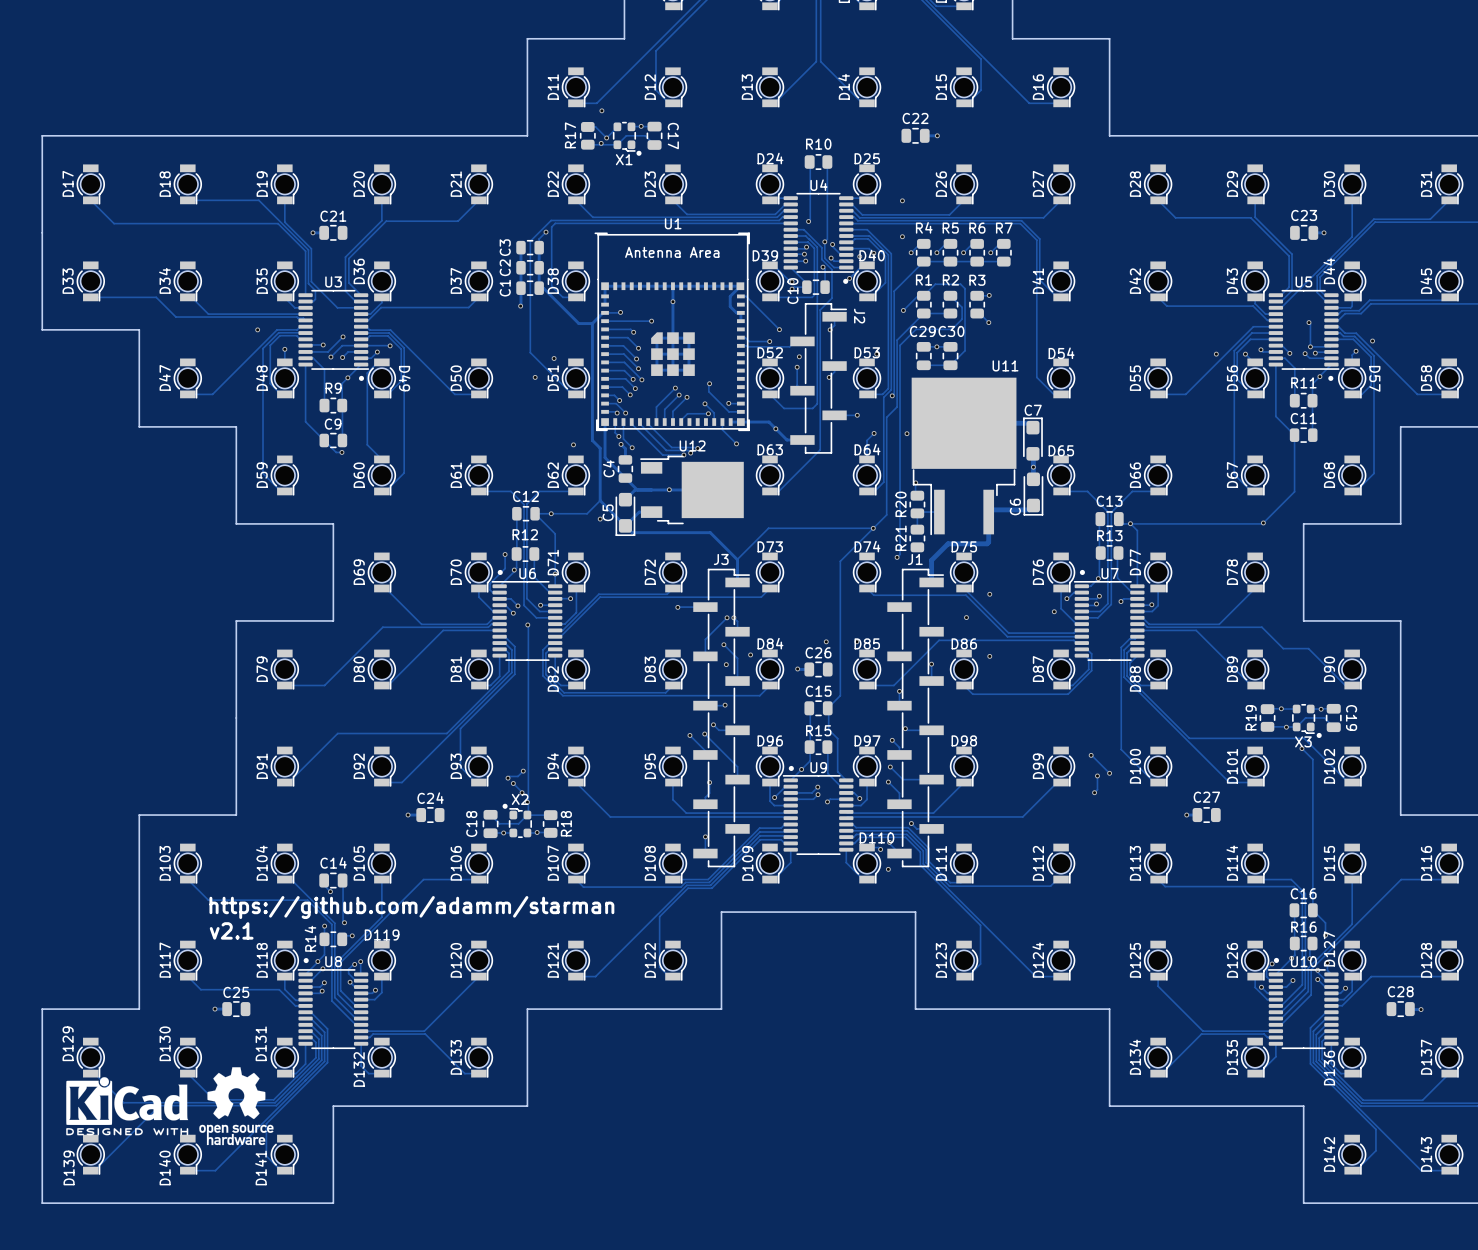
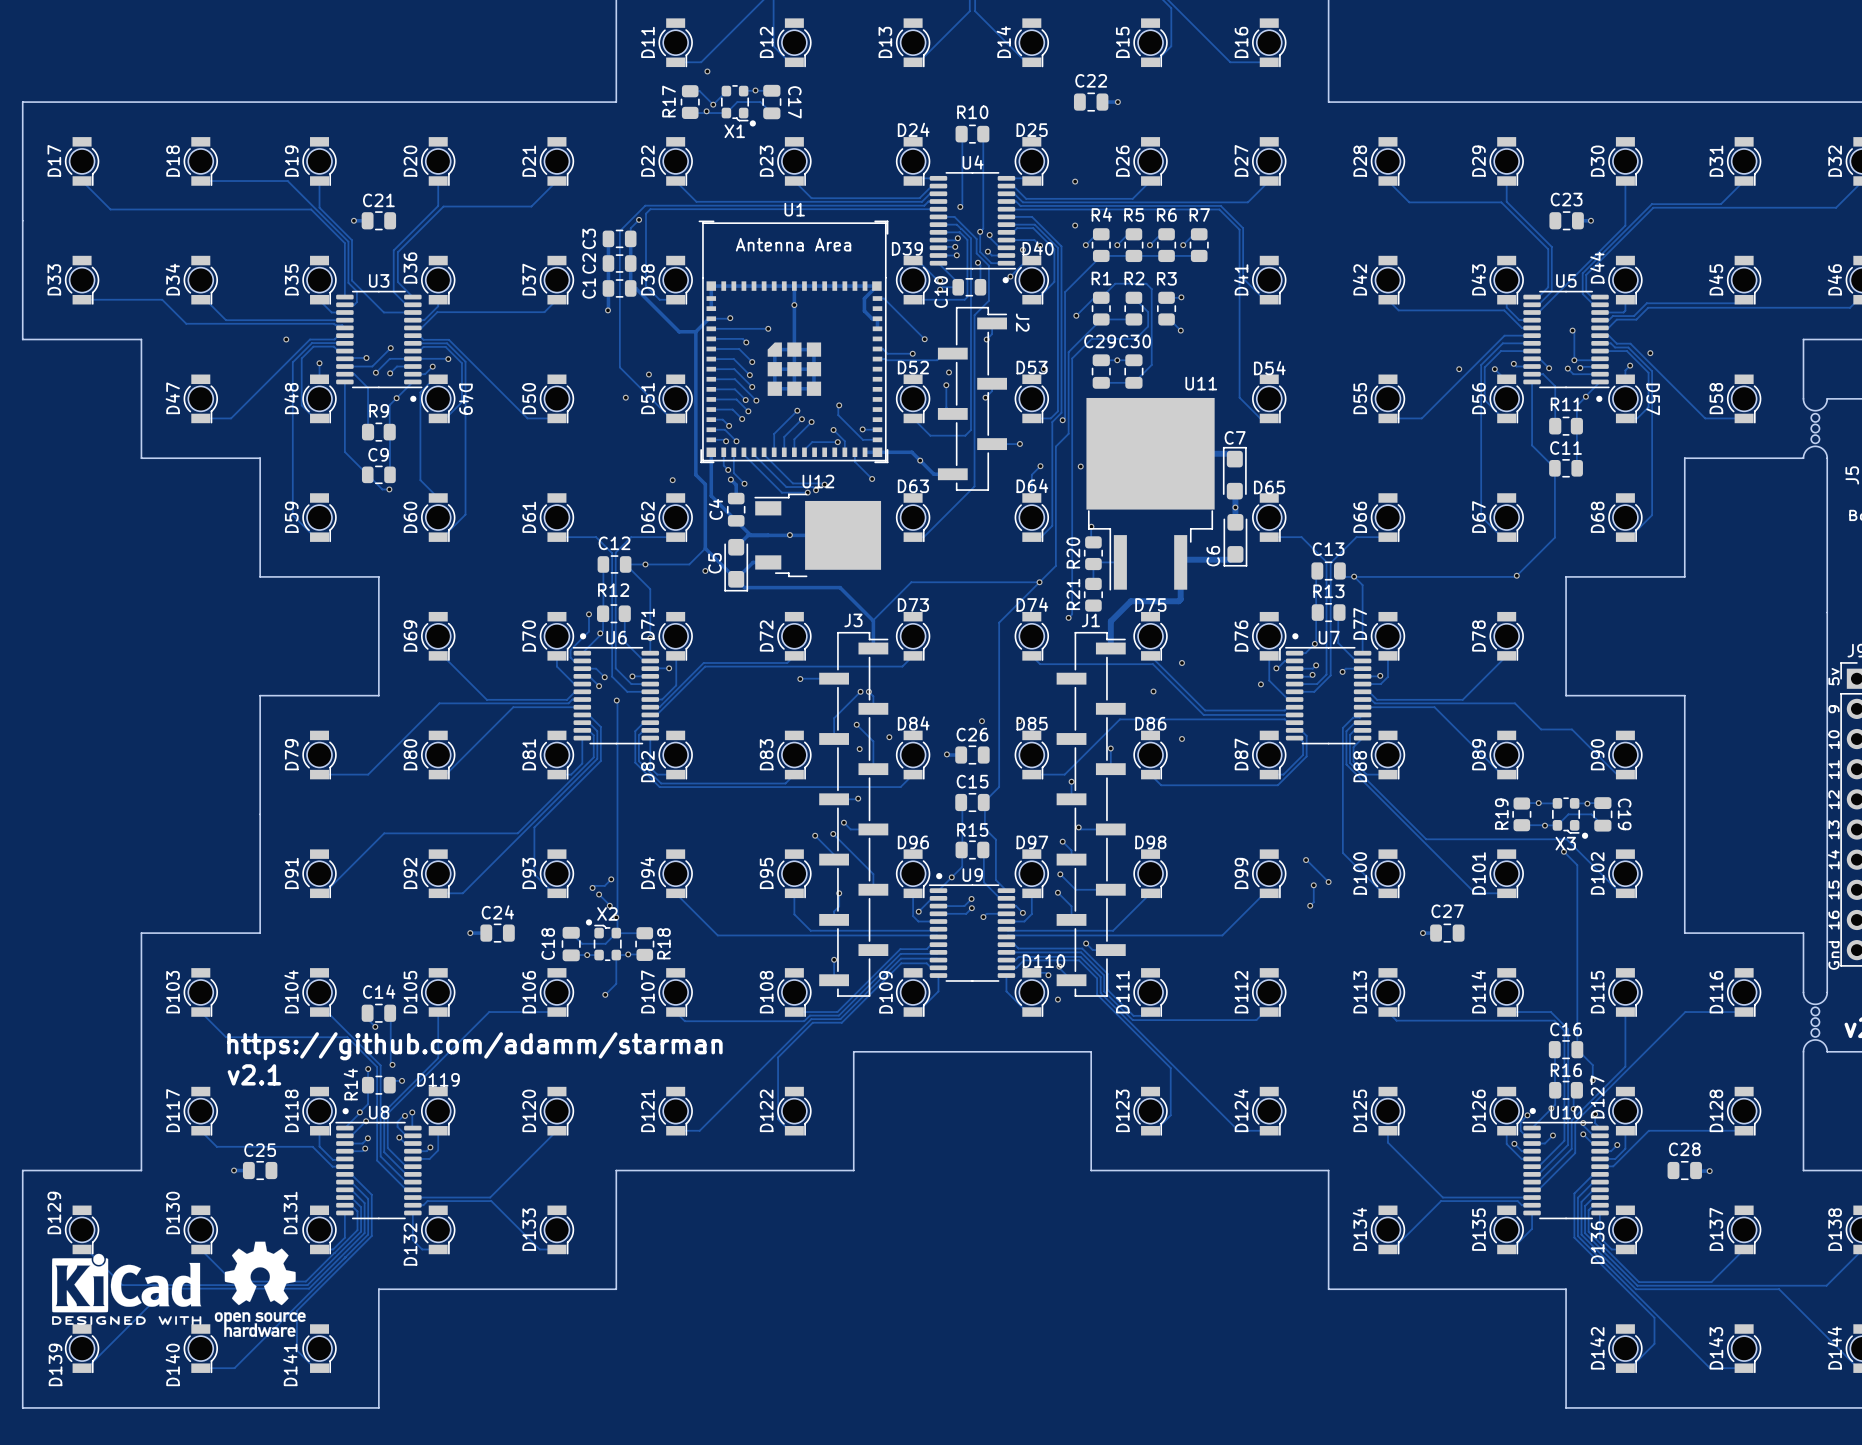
track: none -> (616, 955) (616, 983) (605, 994)
via: none -> (605, 994)

